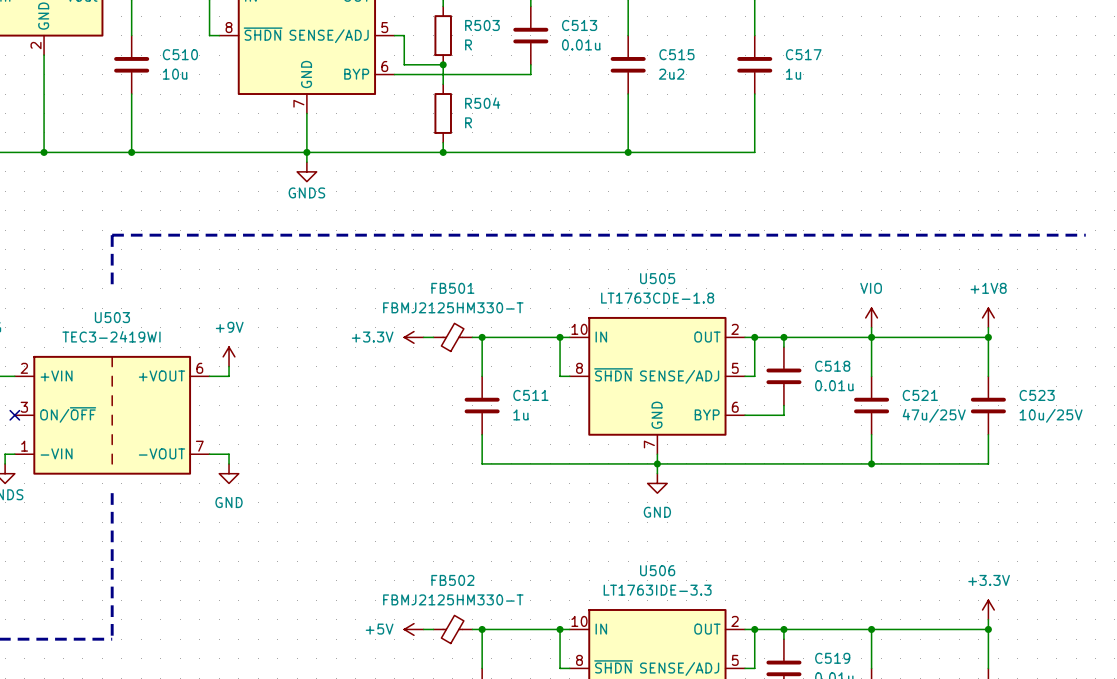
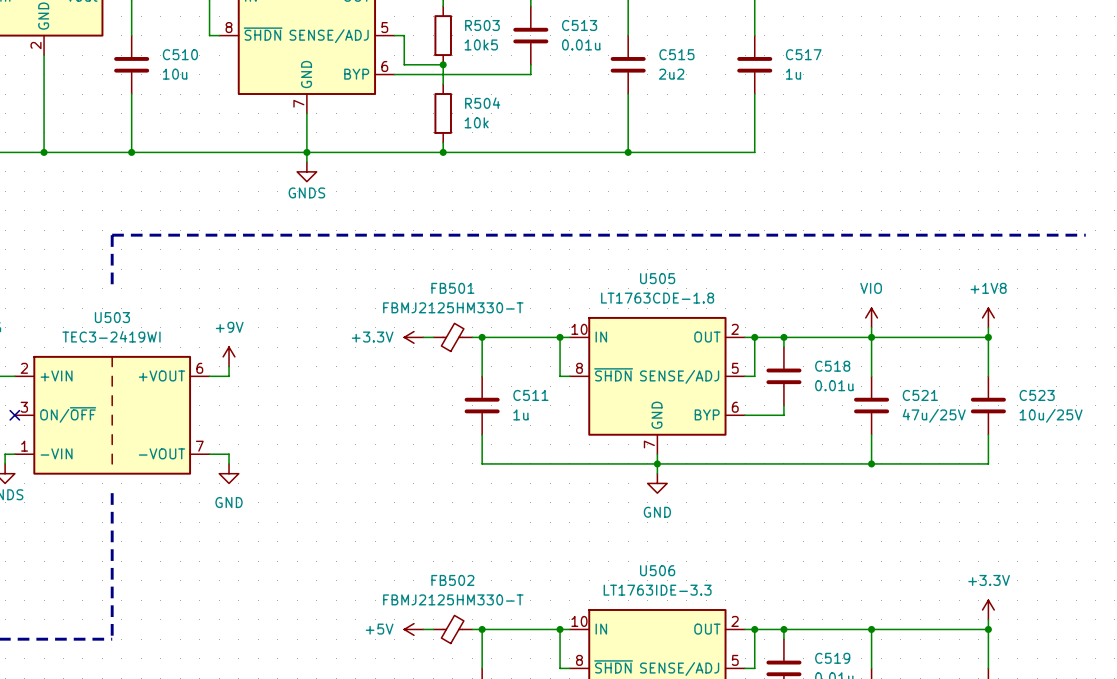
R503 value: R (468, 44) -> 10k5 (481, 44)
R504 value: R (468, 122) -> 10k (476, 122)

